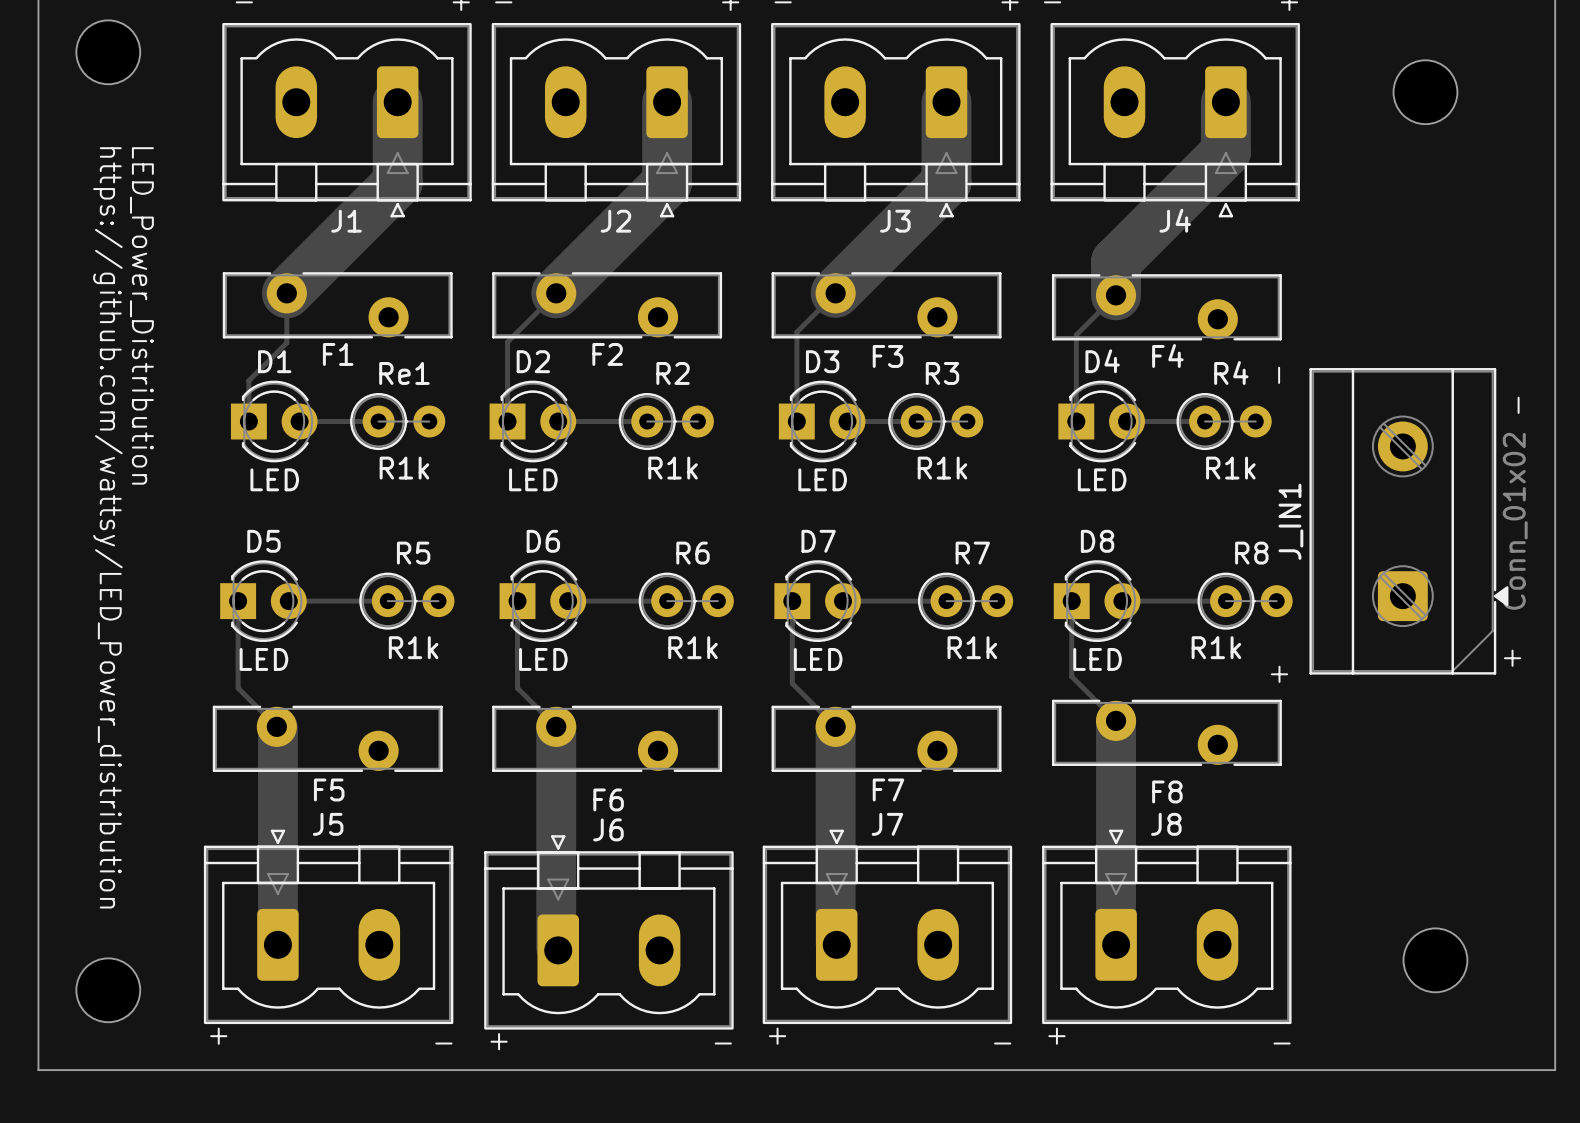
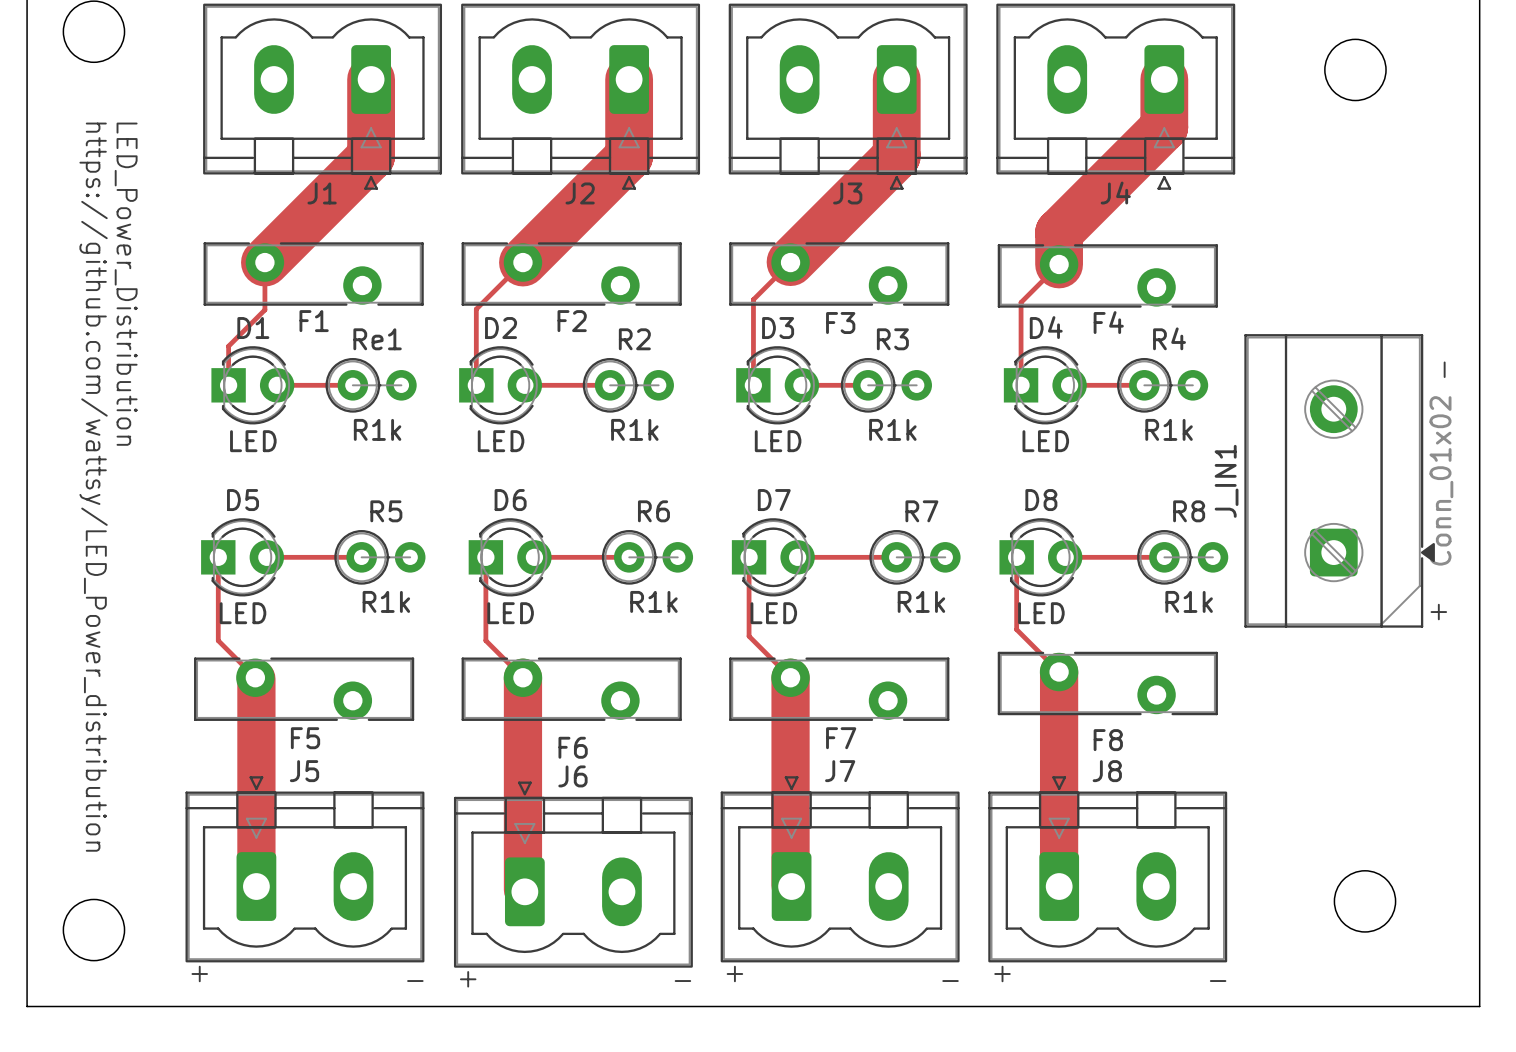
text: - (1279, 375) -> none
R8 value position: R1k (1216, 647) -> R1k (1189, 601)
text: + (1279, 674) -> none

